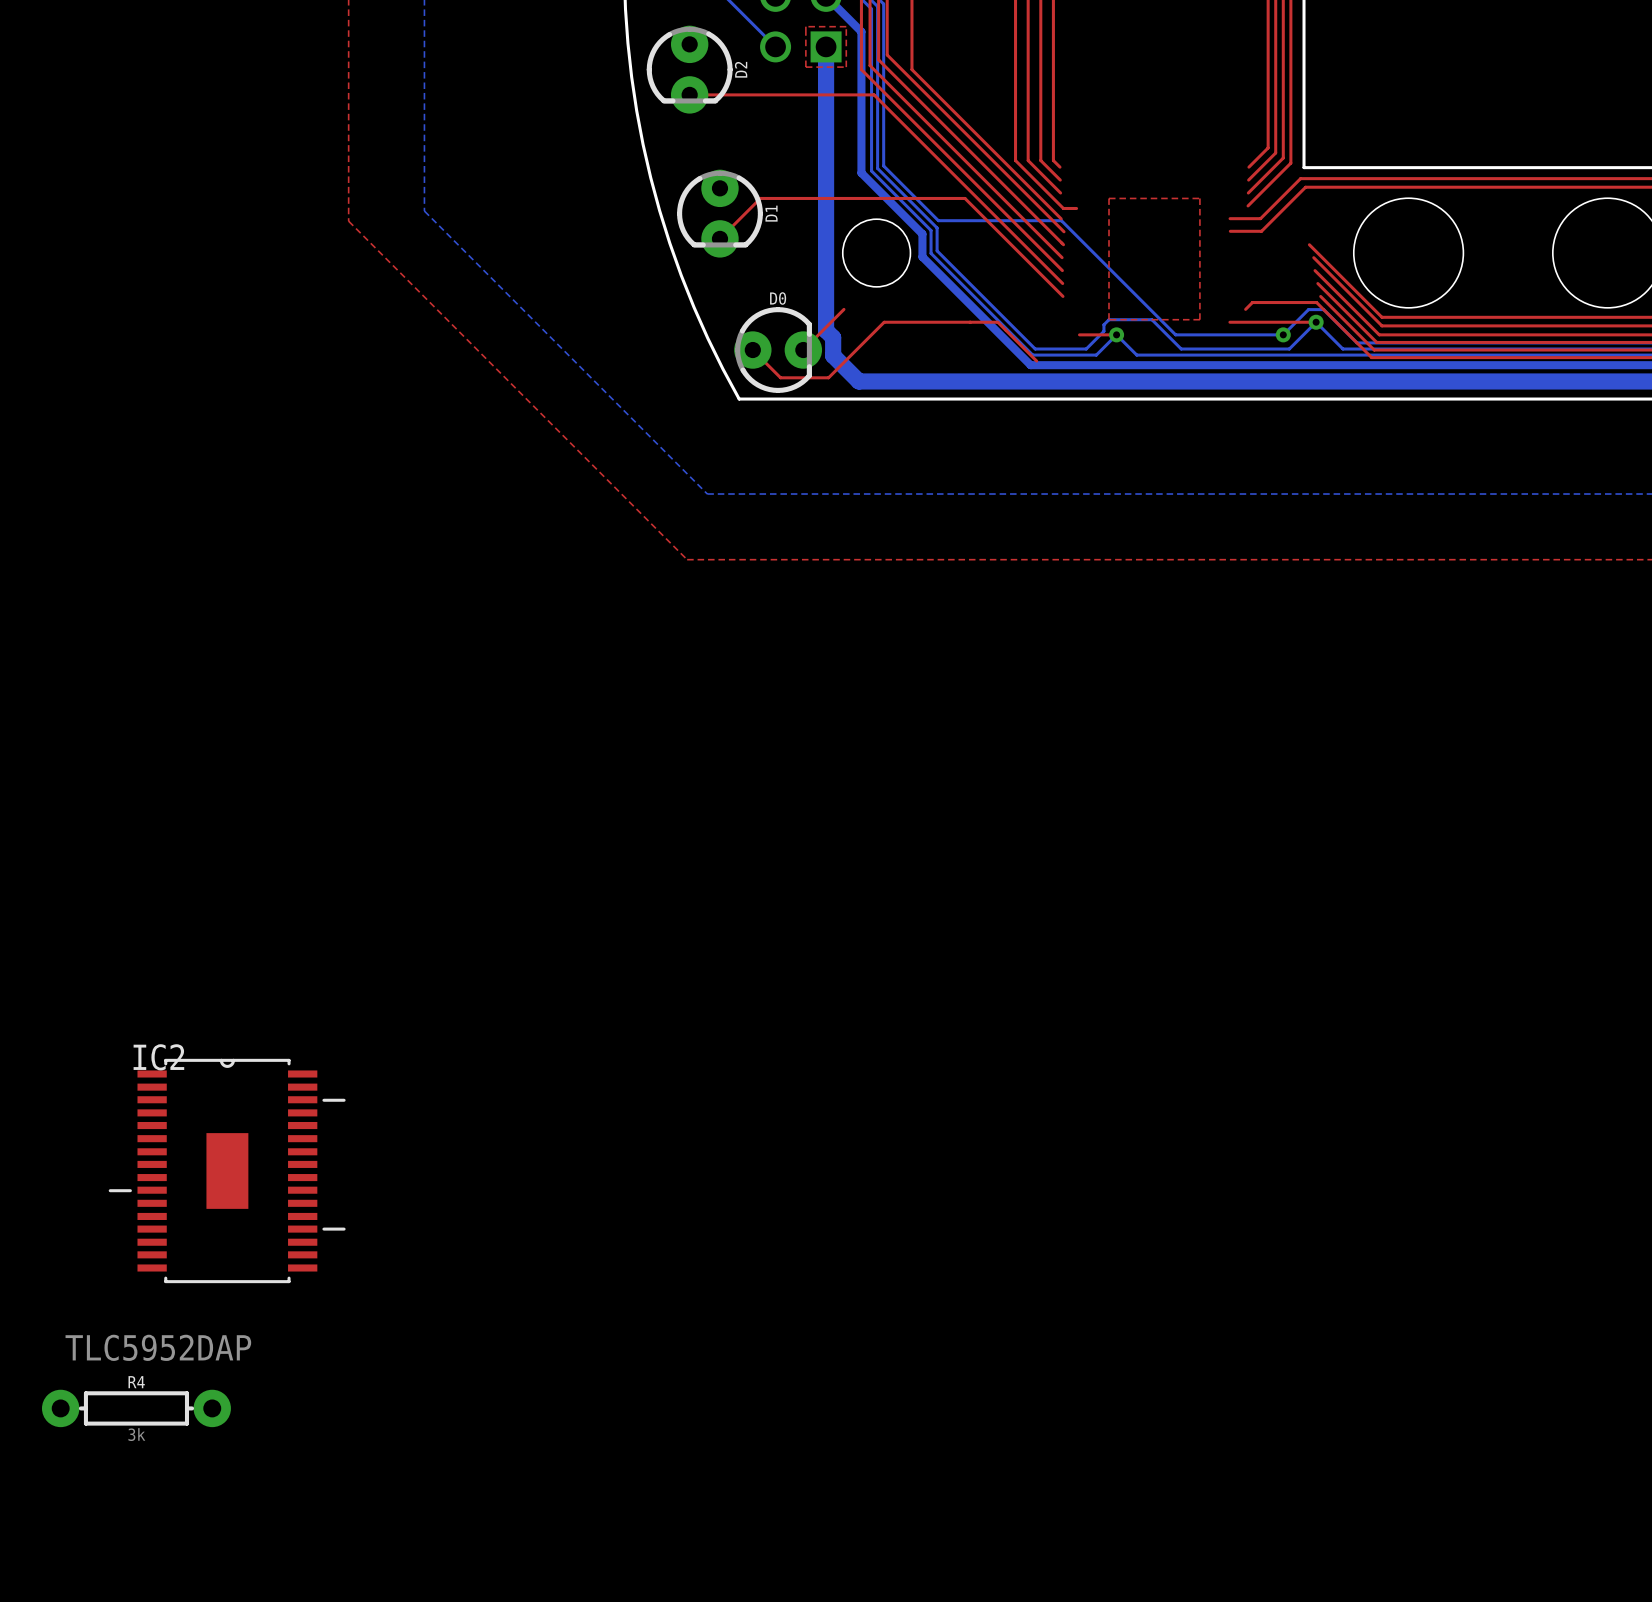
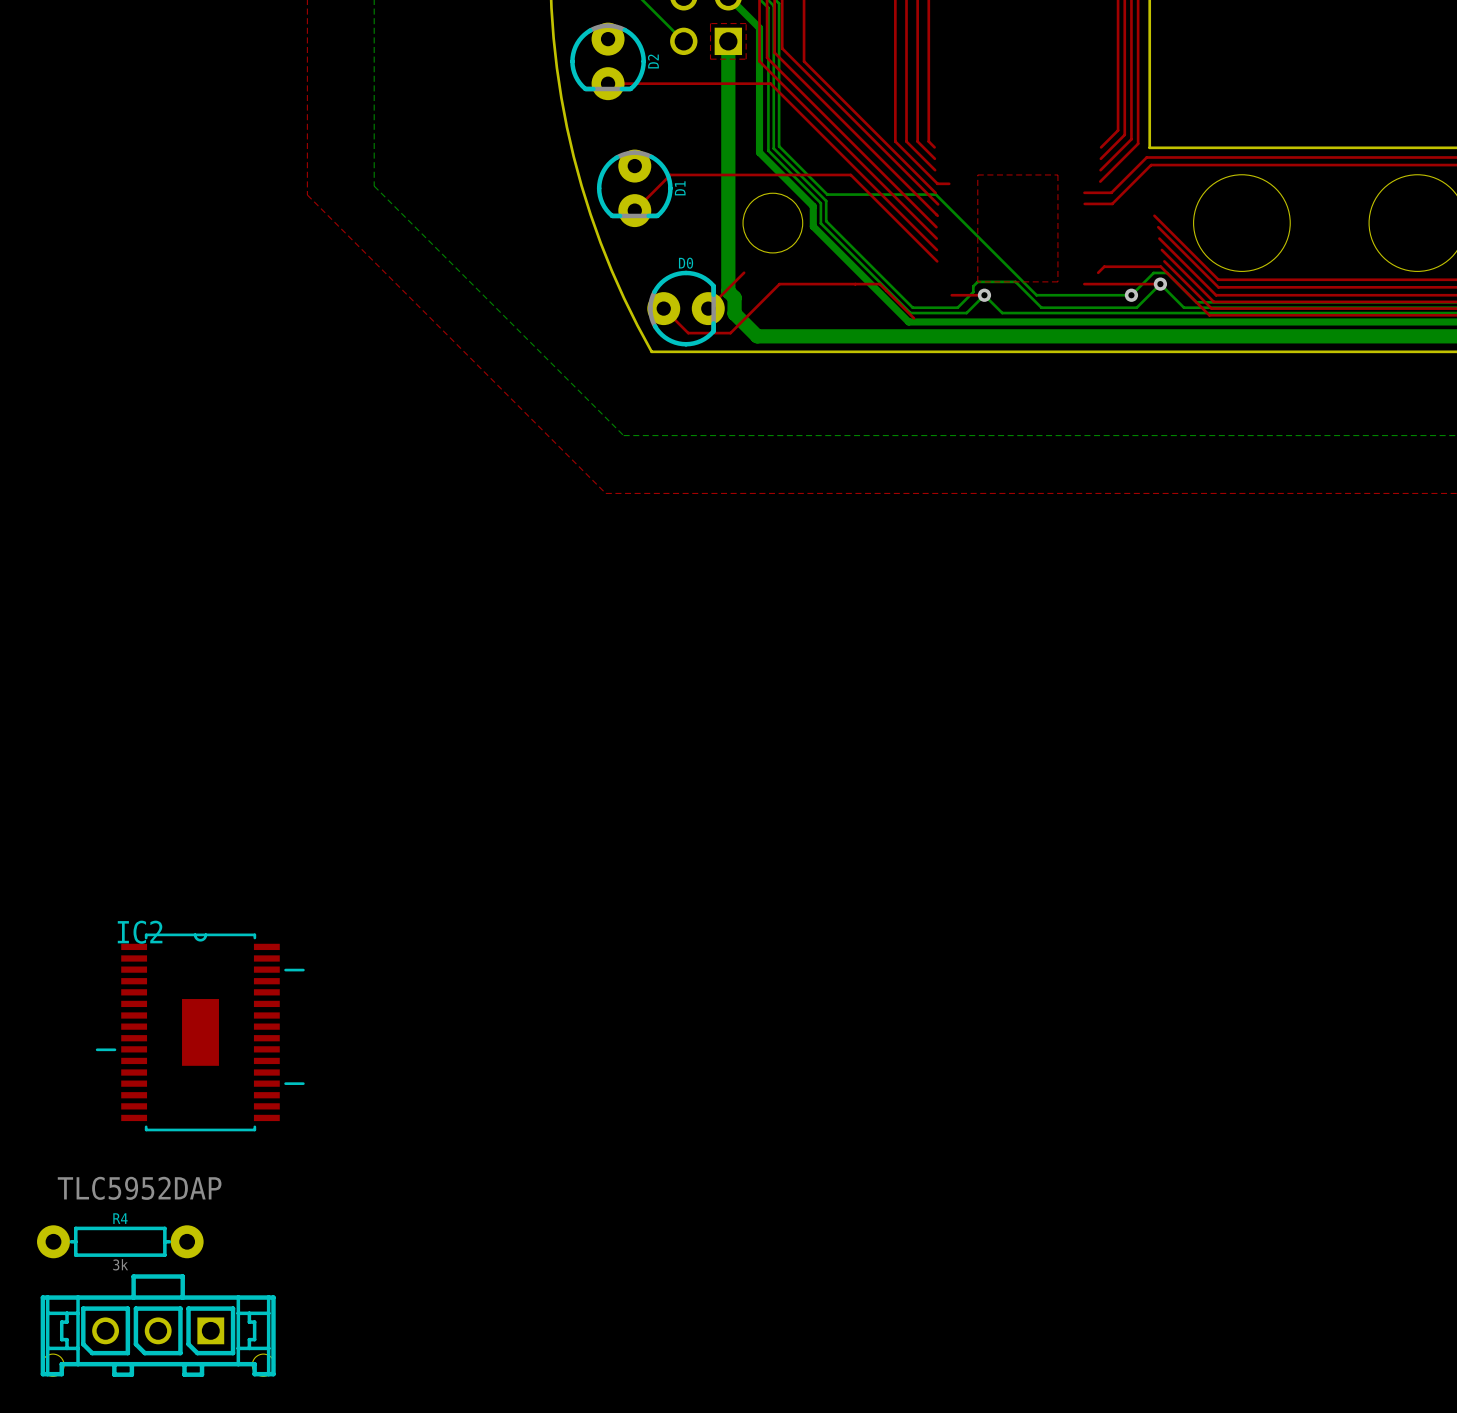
part: none -> (158, 1325)

